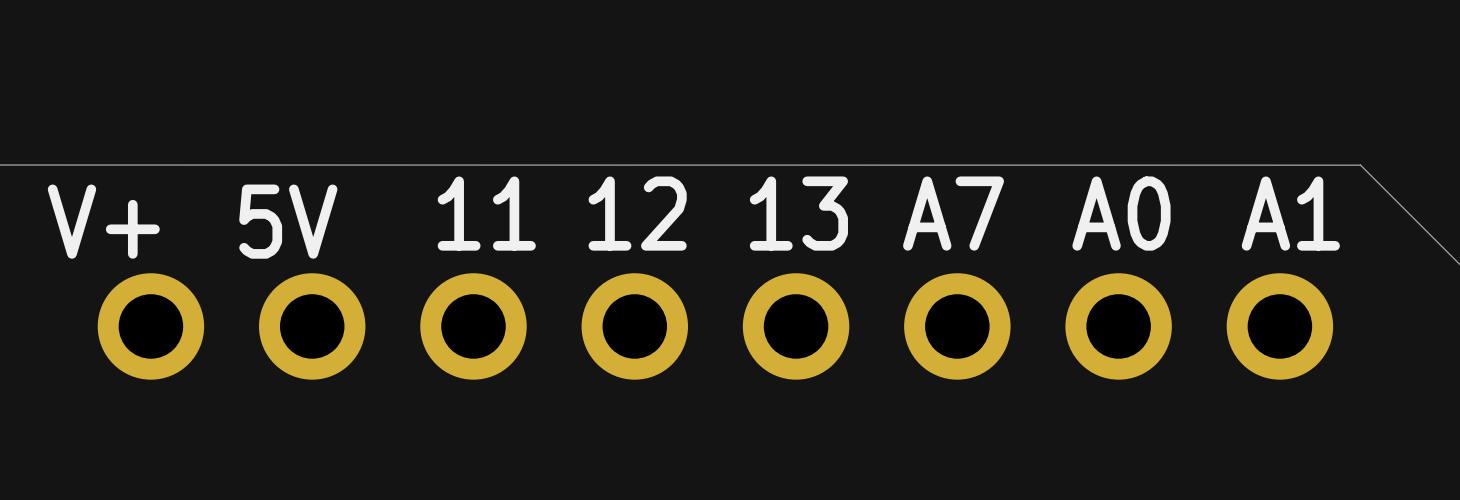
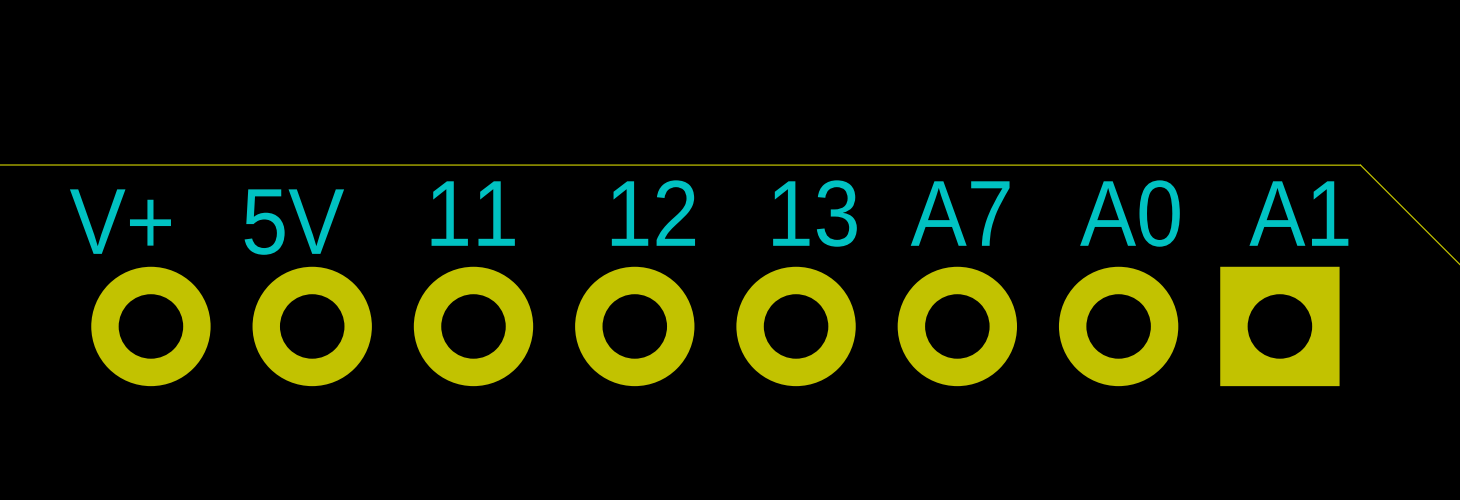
part footprint: [97, 273, 1334, 380] -> [91, 266, 1340, 387]

